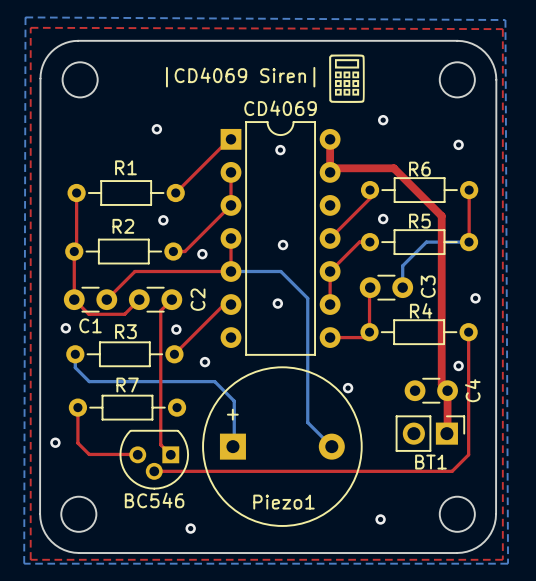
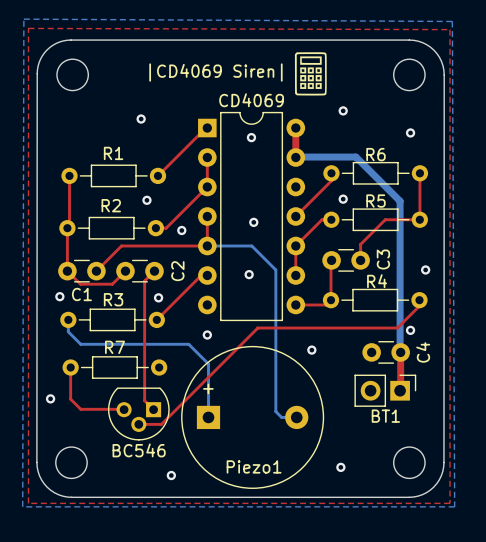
top track: (330, 171) (334, 168) (393, 168) (441, 216) (441, 384) (446, 390) -> none
bottom track: none -> (296, 157) (355, 157) (400, 201) (400, 351)
top track: none -> (419, 219) (385, 219) (360, 244) (360, 260)
bottom track: (469, 242) (426, 242) (402, 265) (402, 287) -> none
top track: (468, 332) (468, 454) (452, 471) (179, 471) -> (420, 304) (397, 328) (257, 328) (161, 424)
via position: (204, 362) -> (207, 335)
bottom track: (210, 381) (214, 381) (234, 401) (232, 446) -> (188, 344) (208, 364) (208, 417)
bottom track: (307, 422) (331, 446) -> (275, 380) (275, 411) (281, 417) (296, 417)
Piezo1 position: (282, 446) -> (252, 417)

